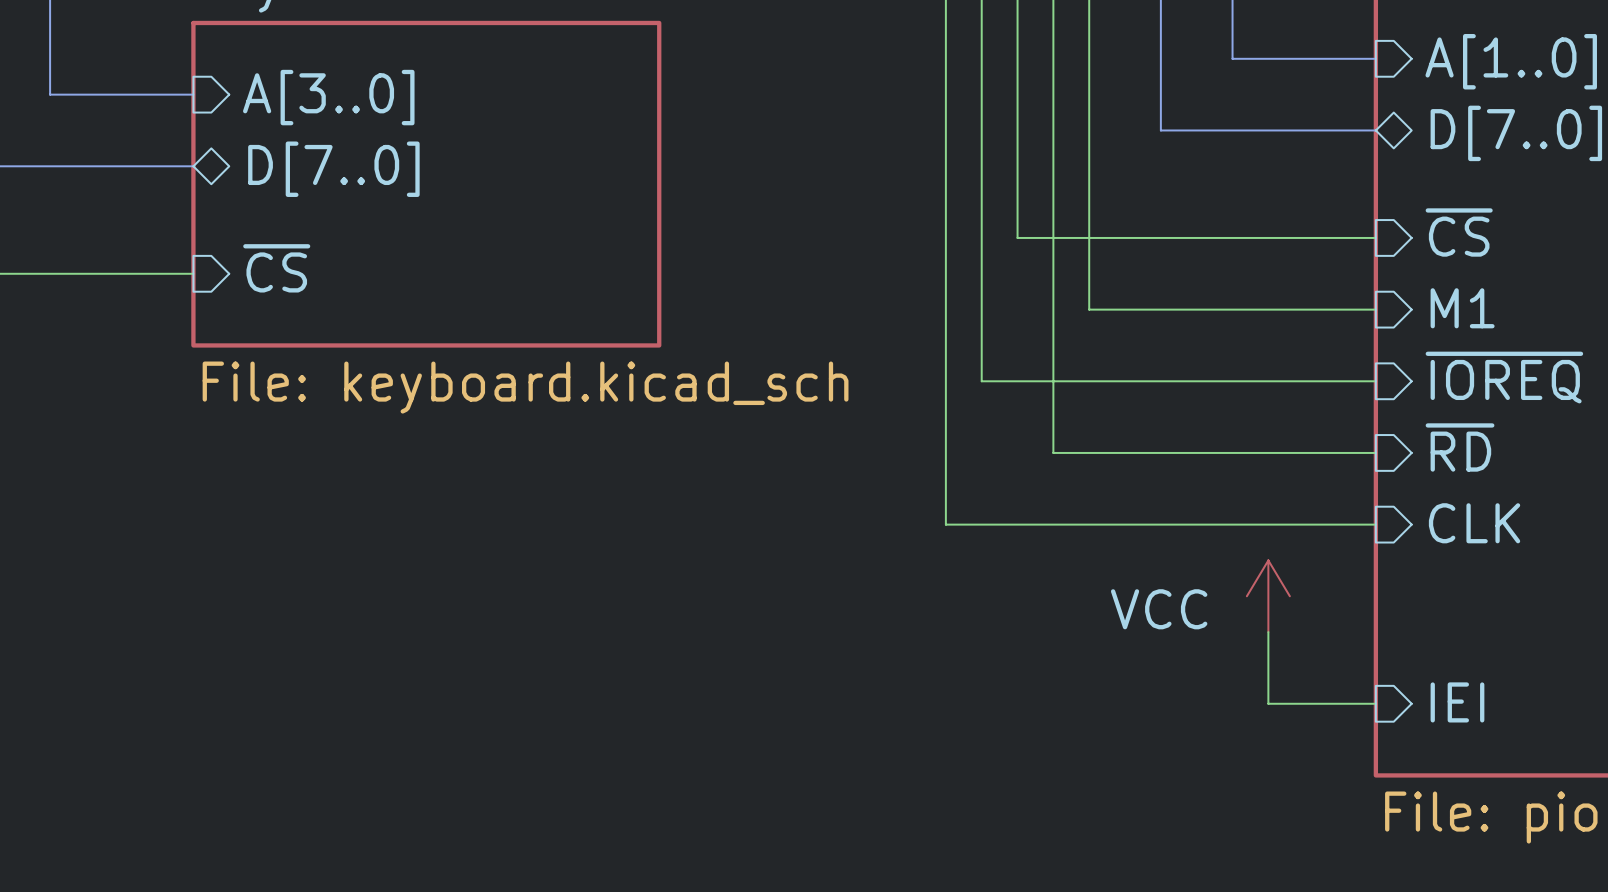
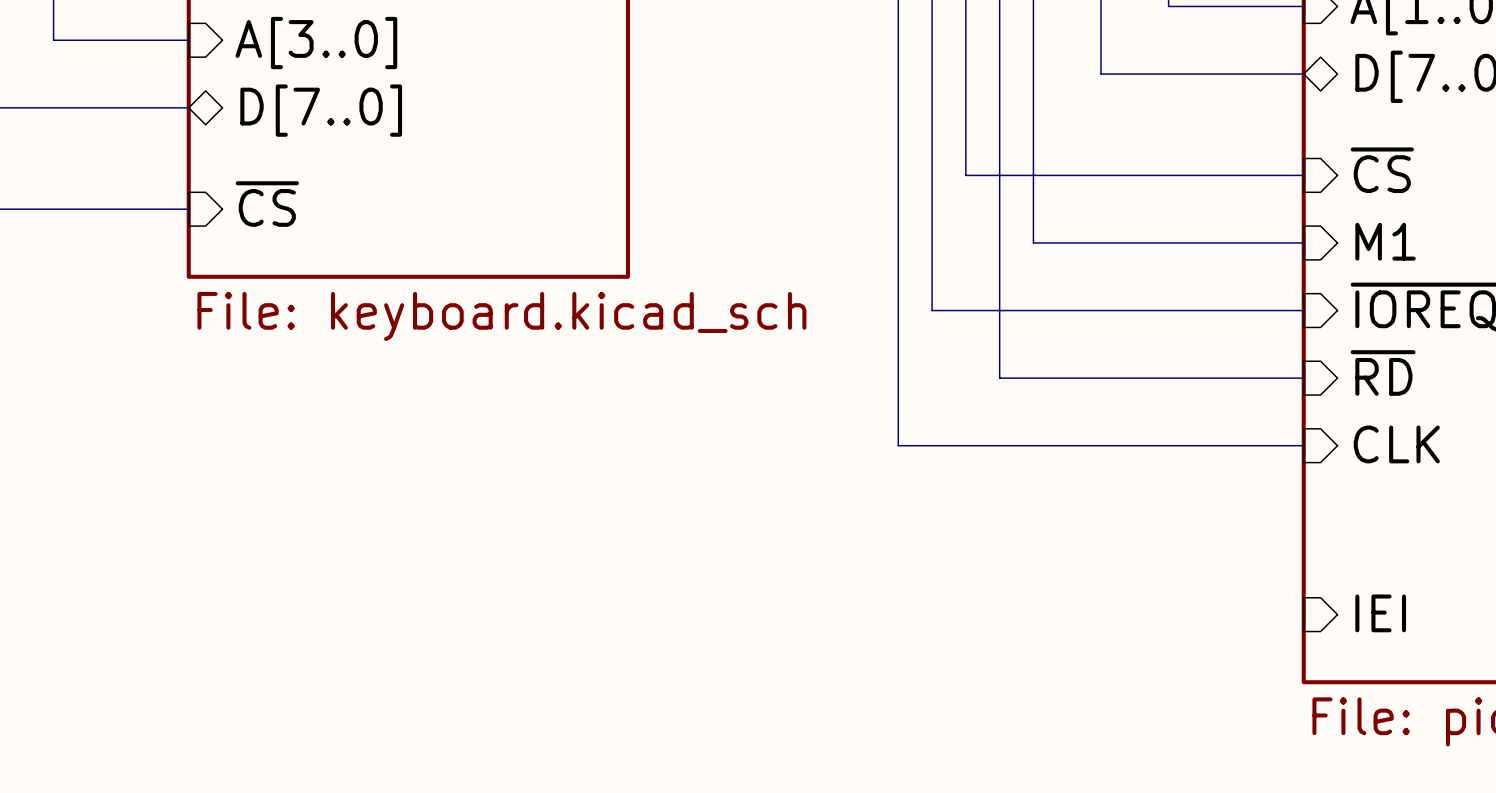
power symbol: VCC (1268, 596) -> none
wire: (1268, 632) (1268, 703) (1375, 703) -> none

